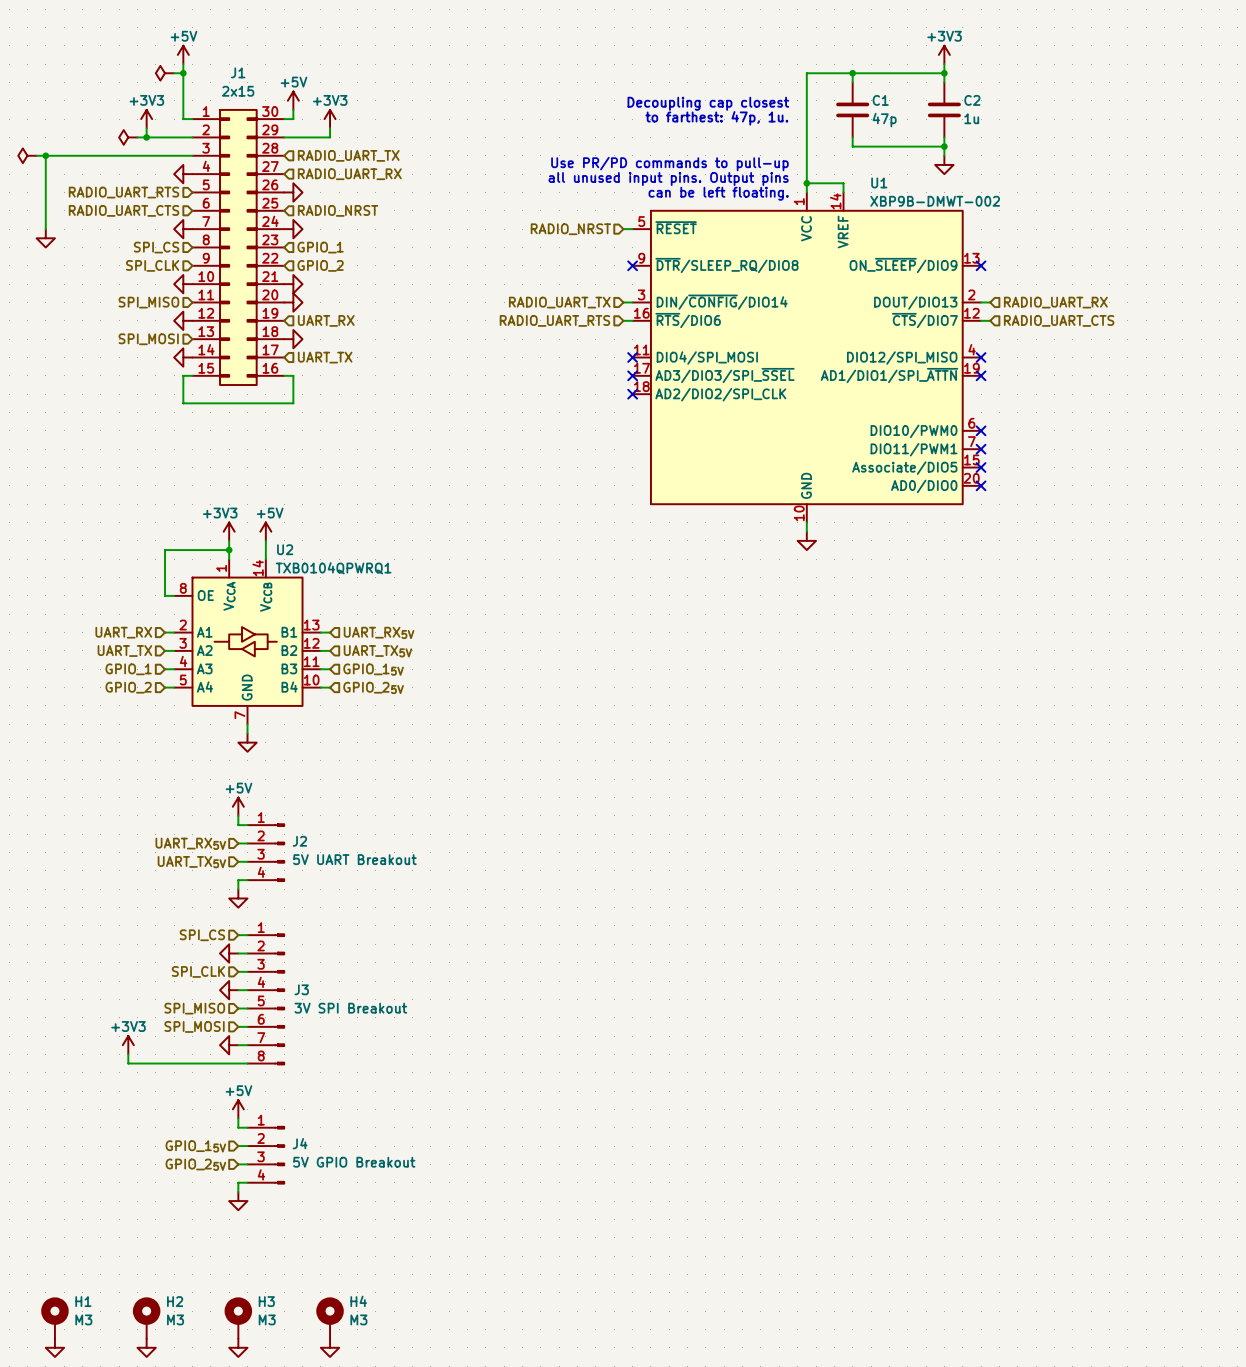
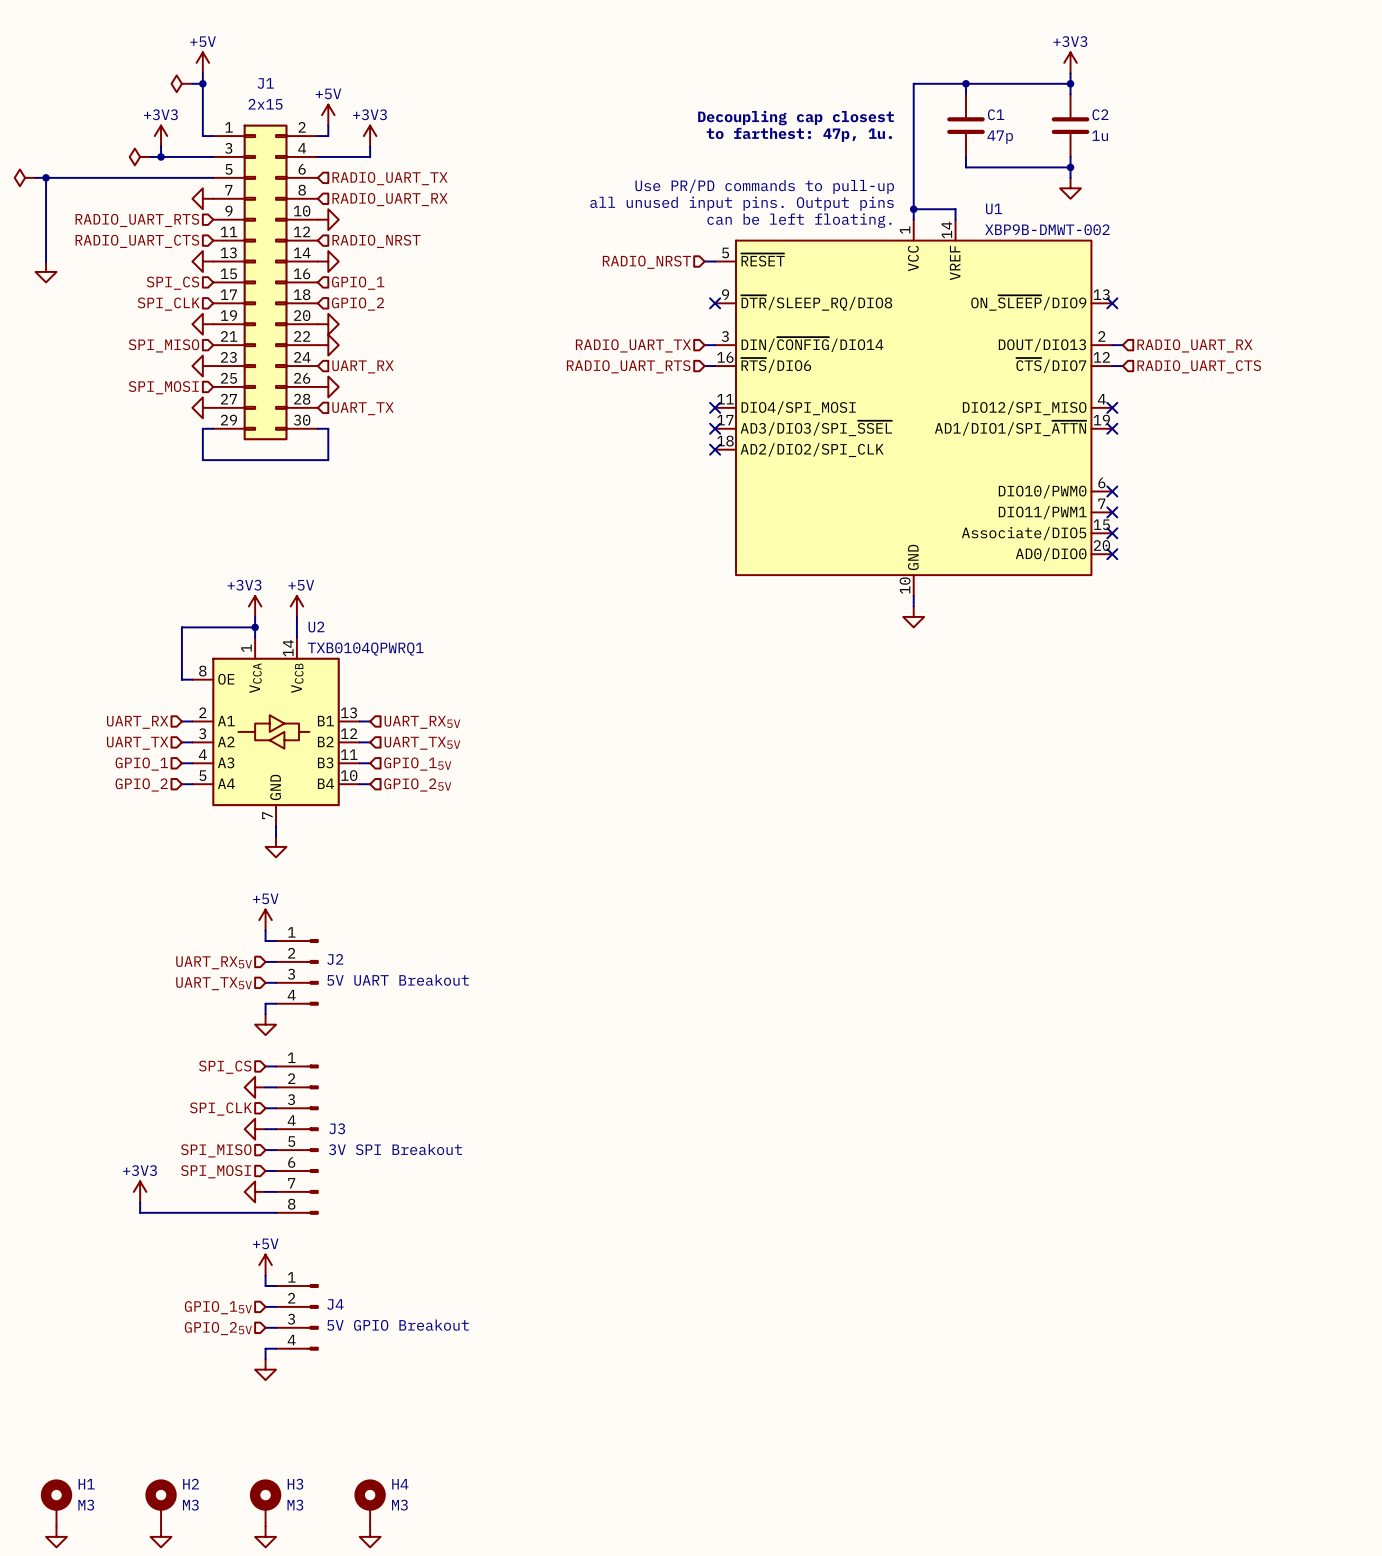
J1 symbol: [192, 109, 285, 386] -> [213, 124, 318, 441]

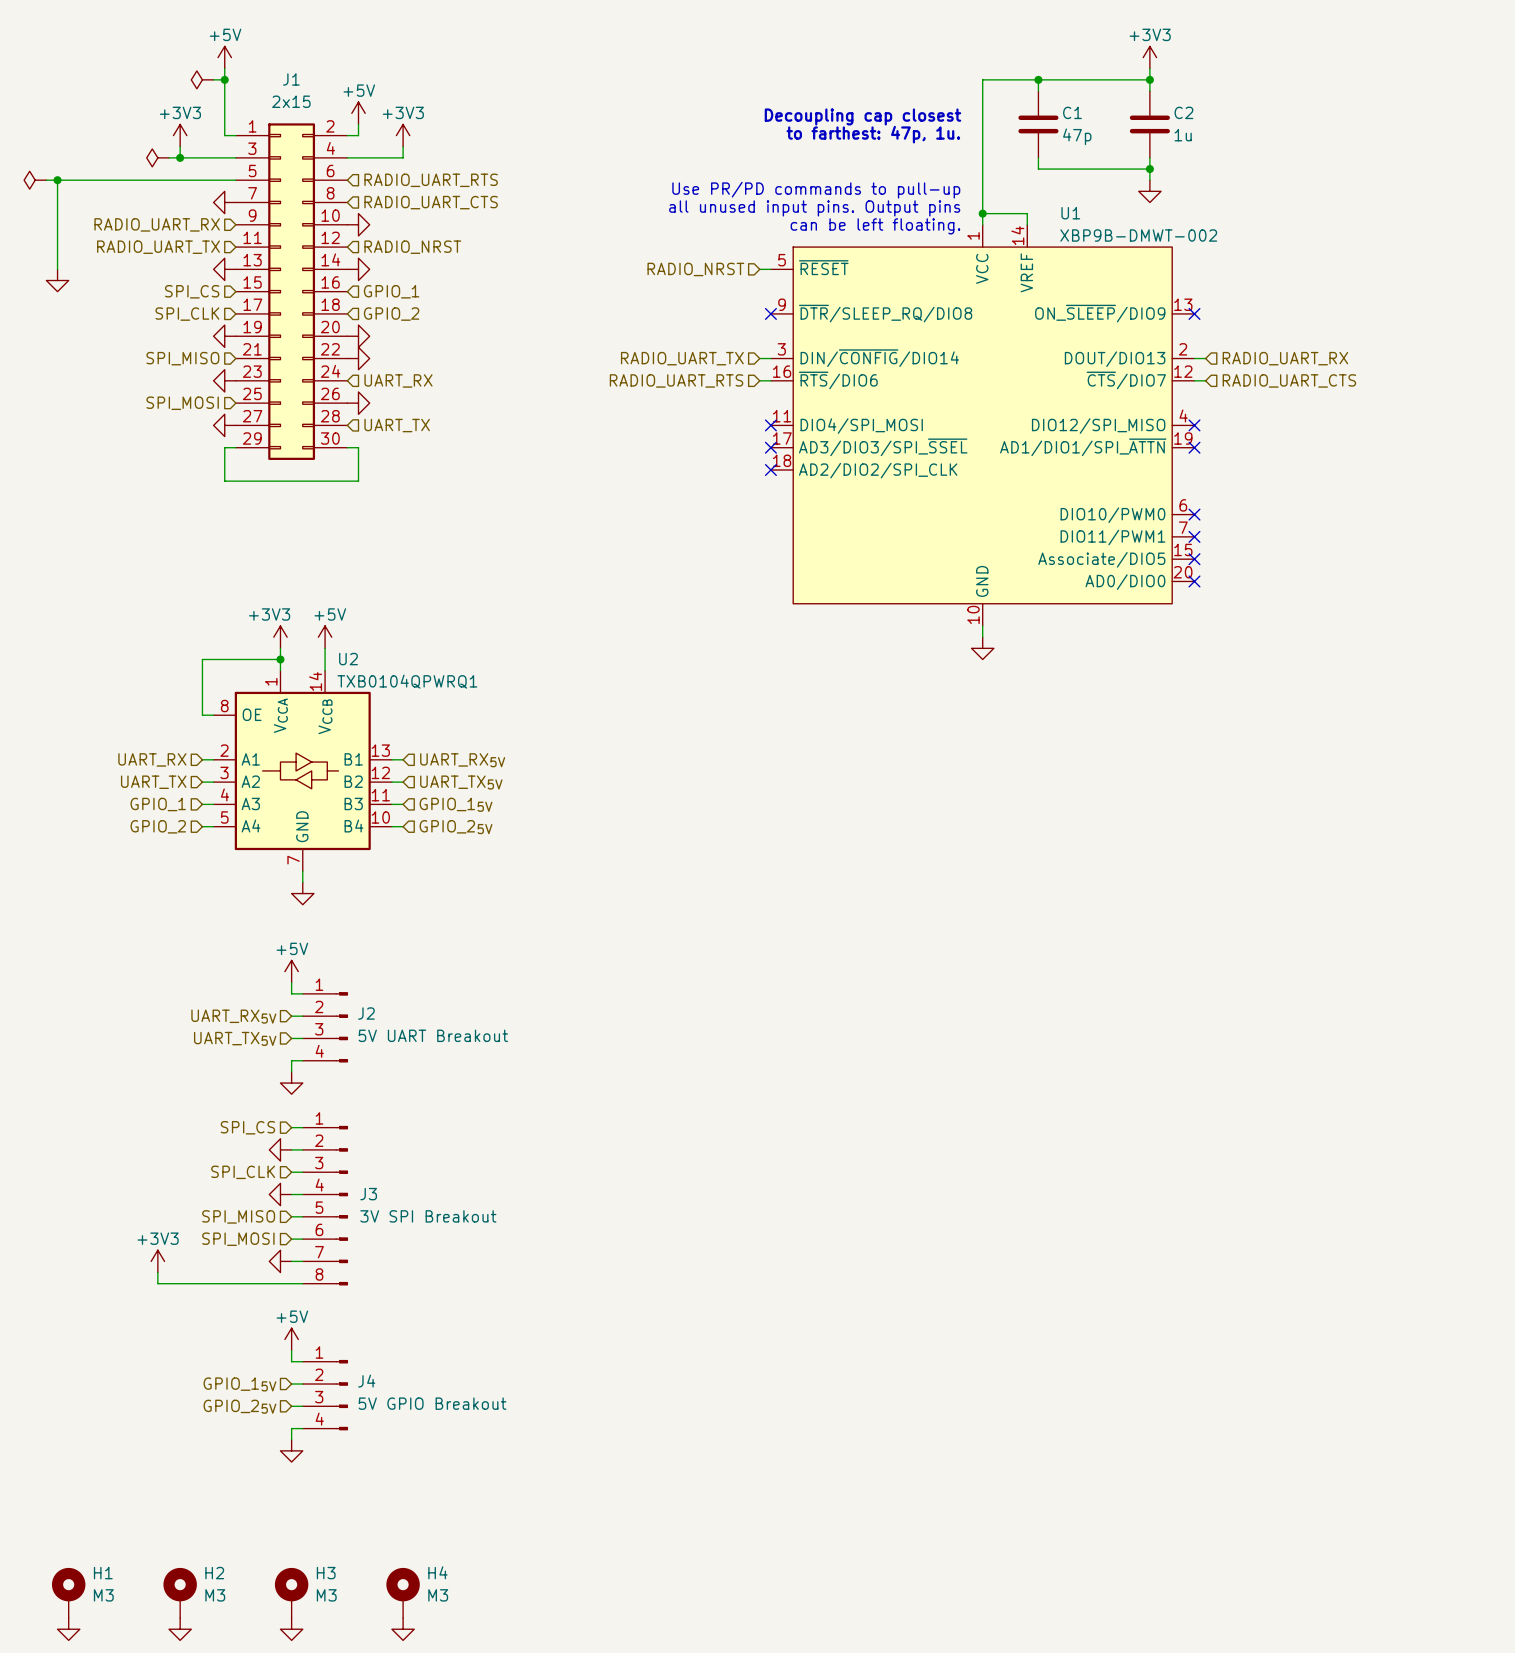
hierarchical label: RADIO_UART_TX (390, 178) -> RADIO_UART_RTS (431, 180)
hierarchical label: RADIO_UART_RX (390, 199) -> RADIO_UART_CTS (431, 202)
hierarchical label: RADIO_UART_RTS (137, 220) -> RADIO_UART_RX (157, 224)
hierarchical label: RADIO_UART_CTS (137, 241) -> RADIO_UART_TX (158, 247)

